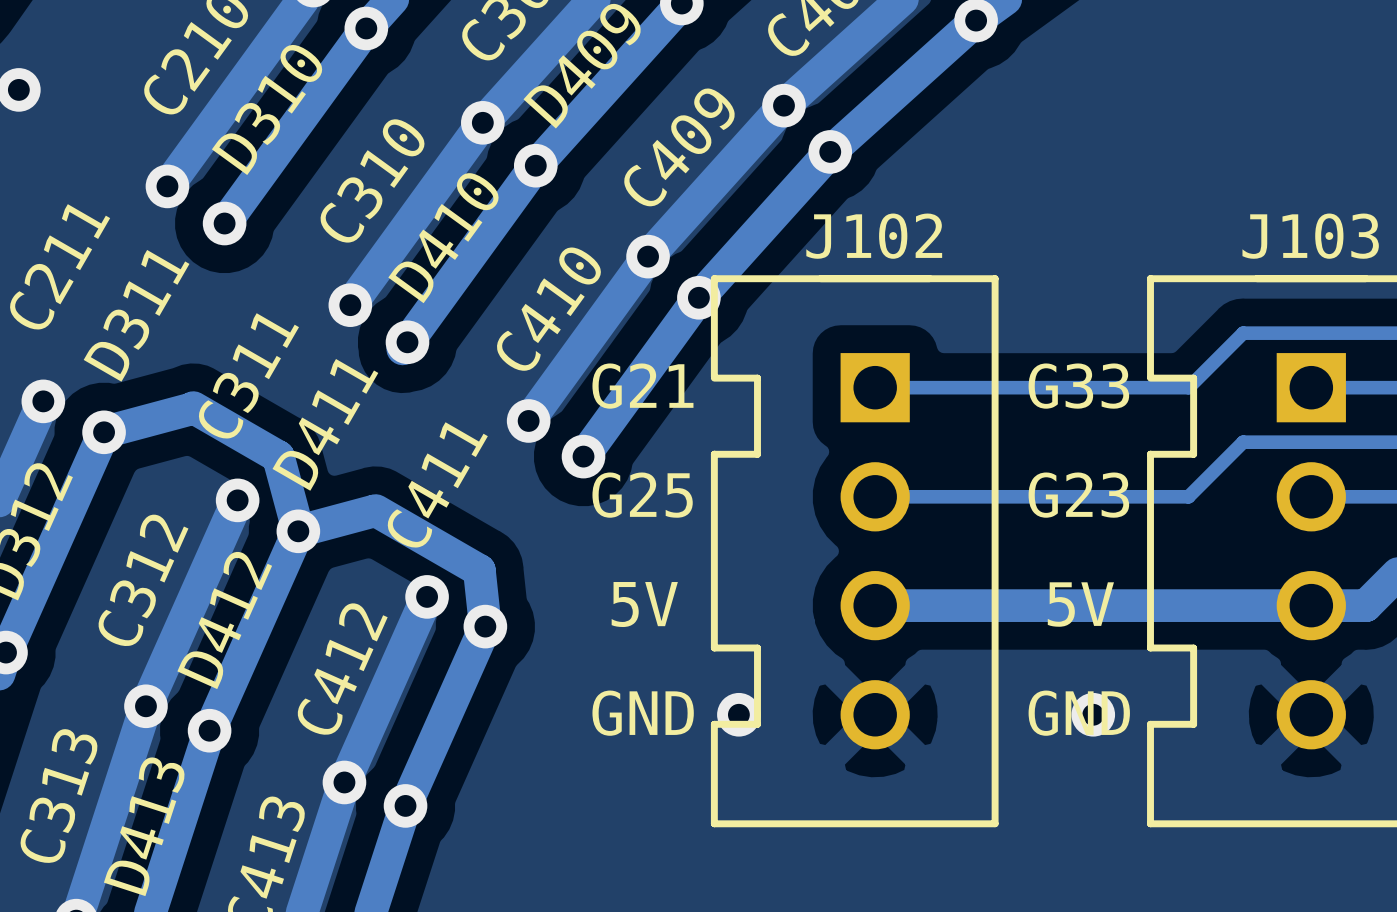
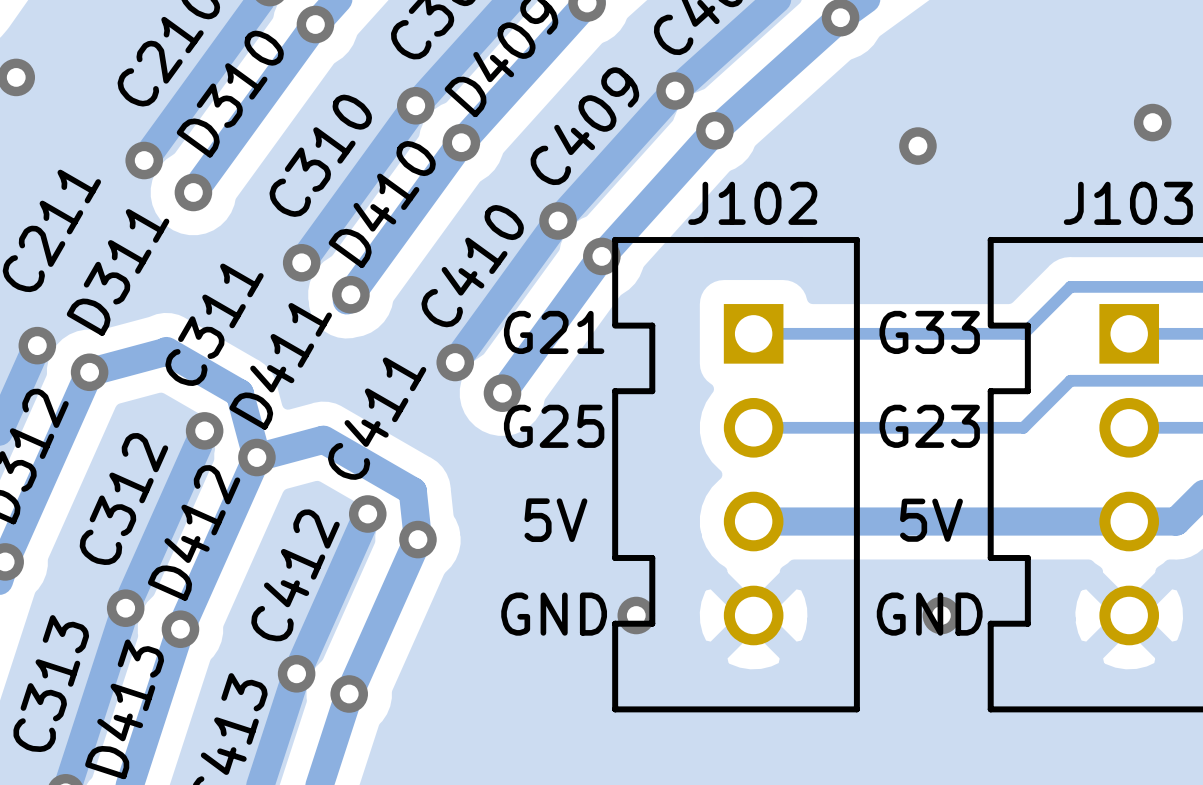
via: none -> (1152, 122)
via: none -> (917, 146)

